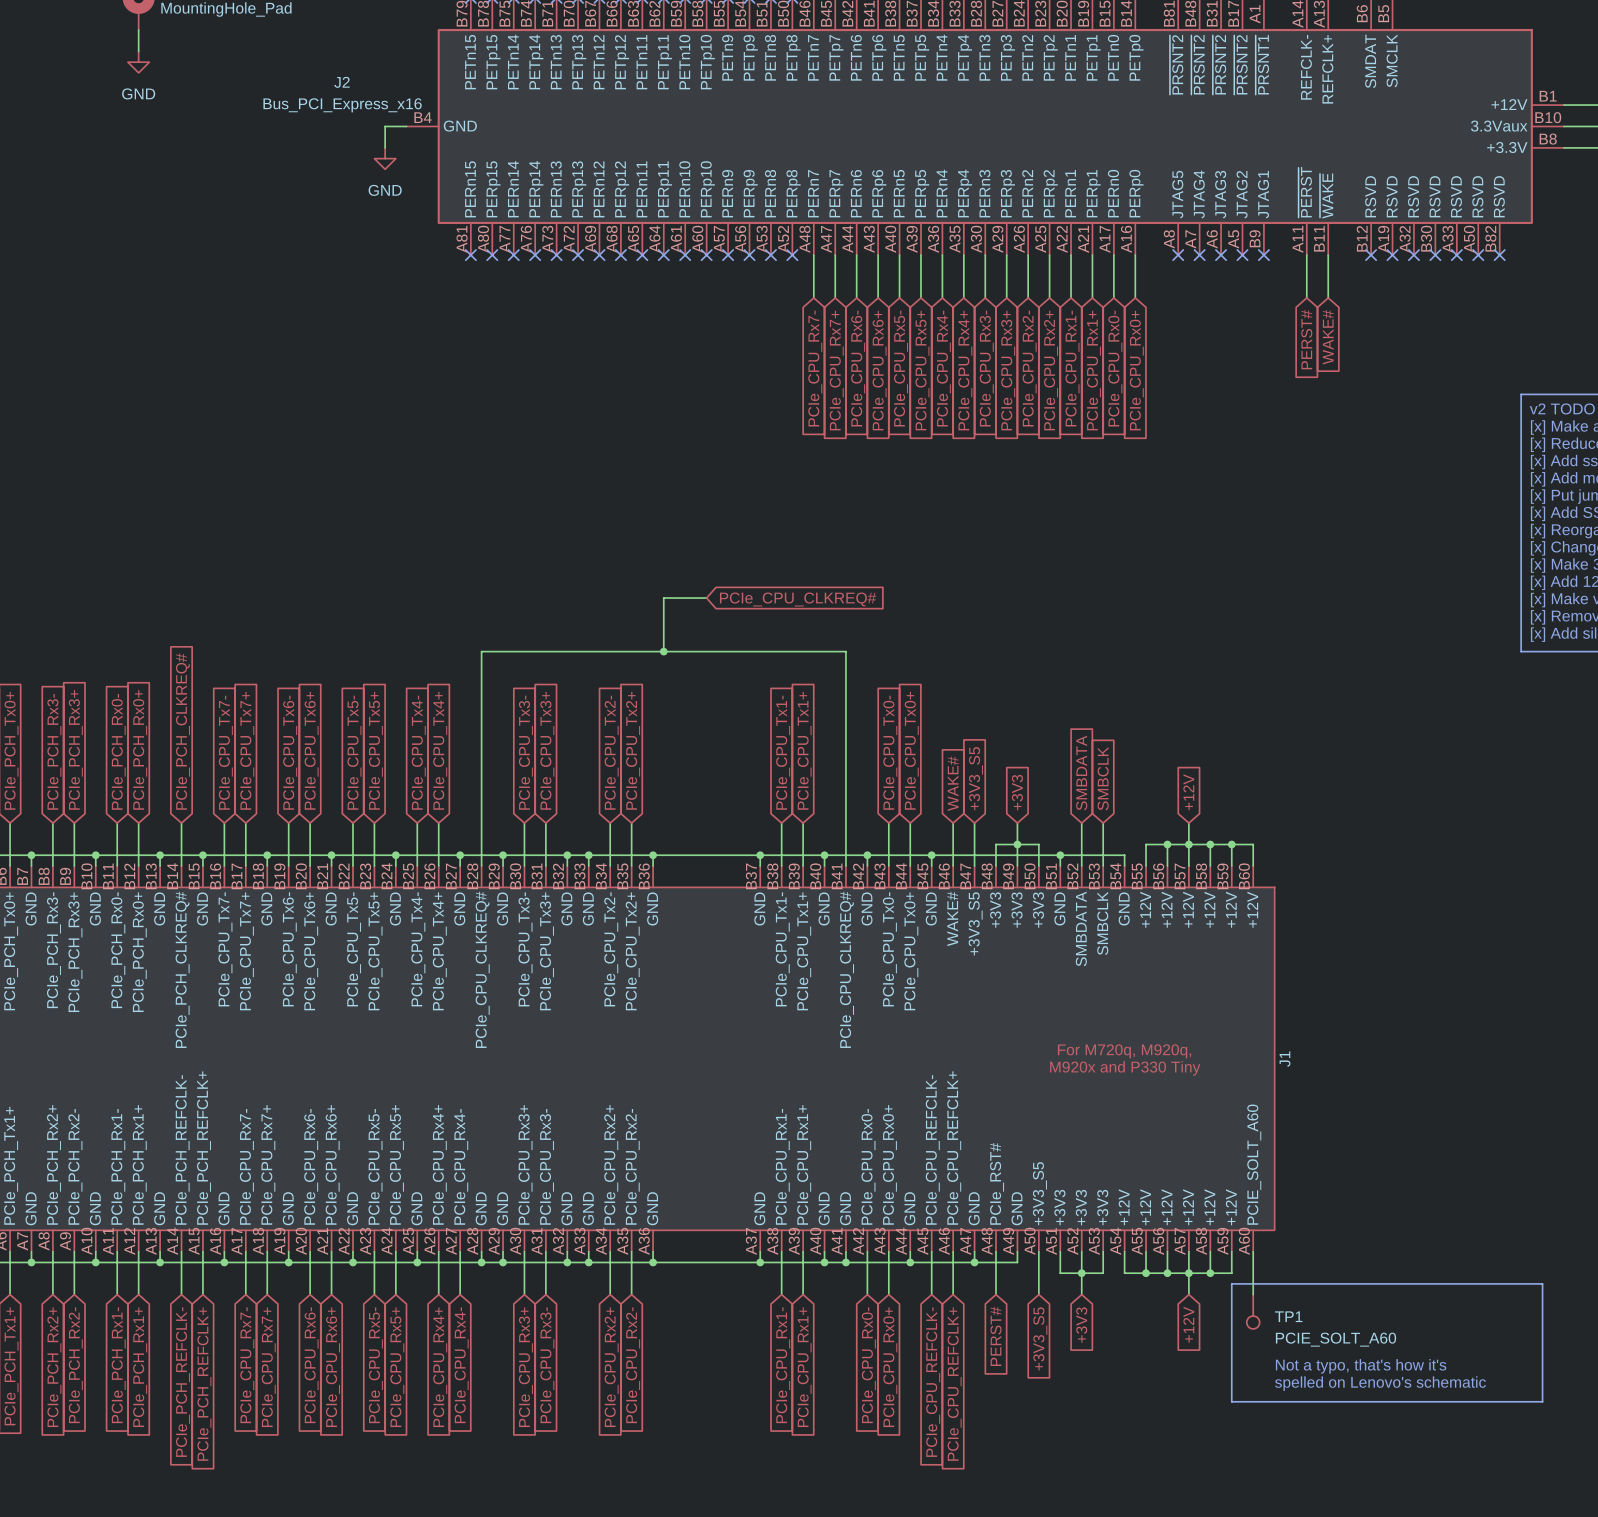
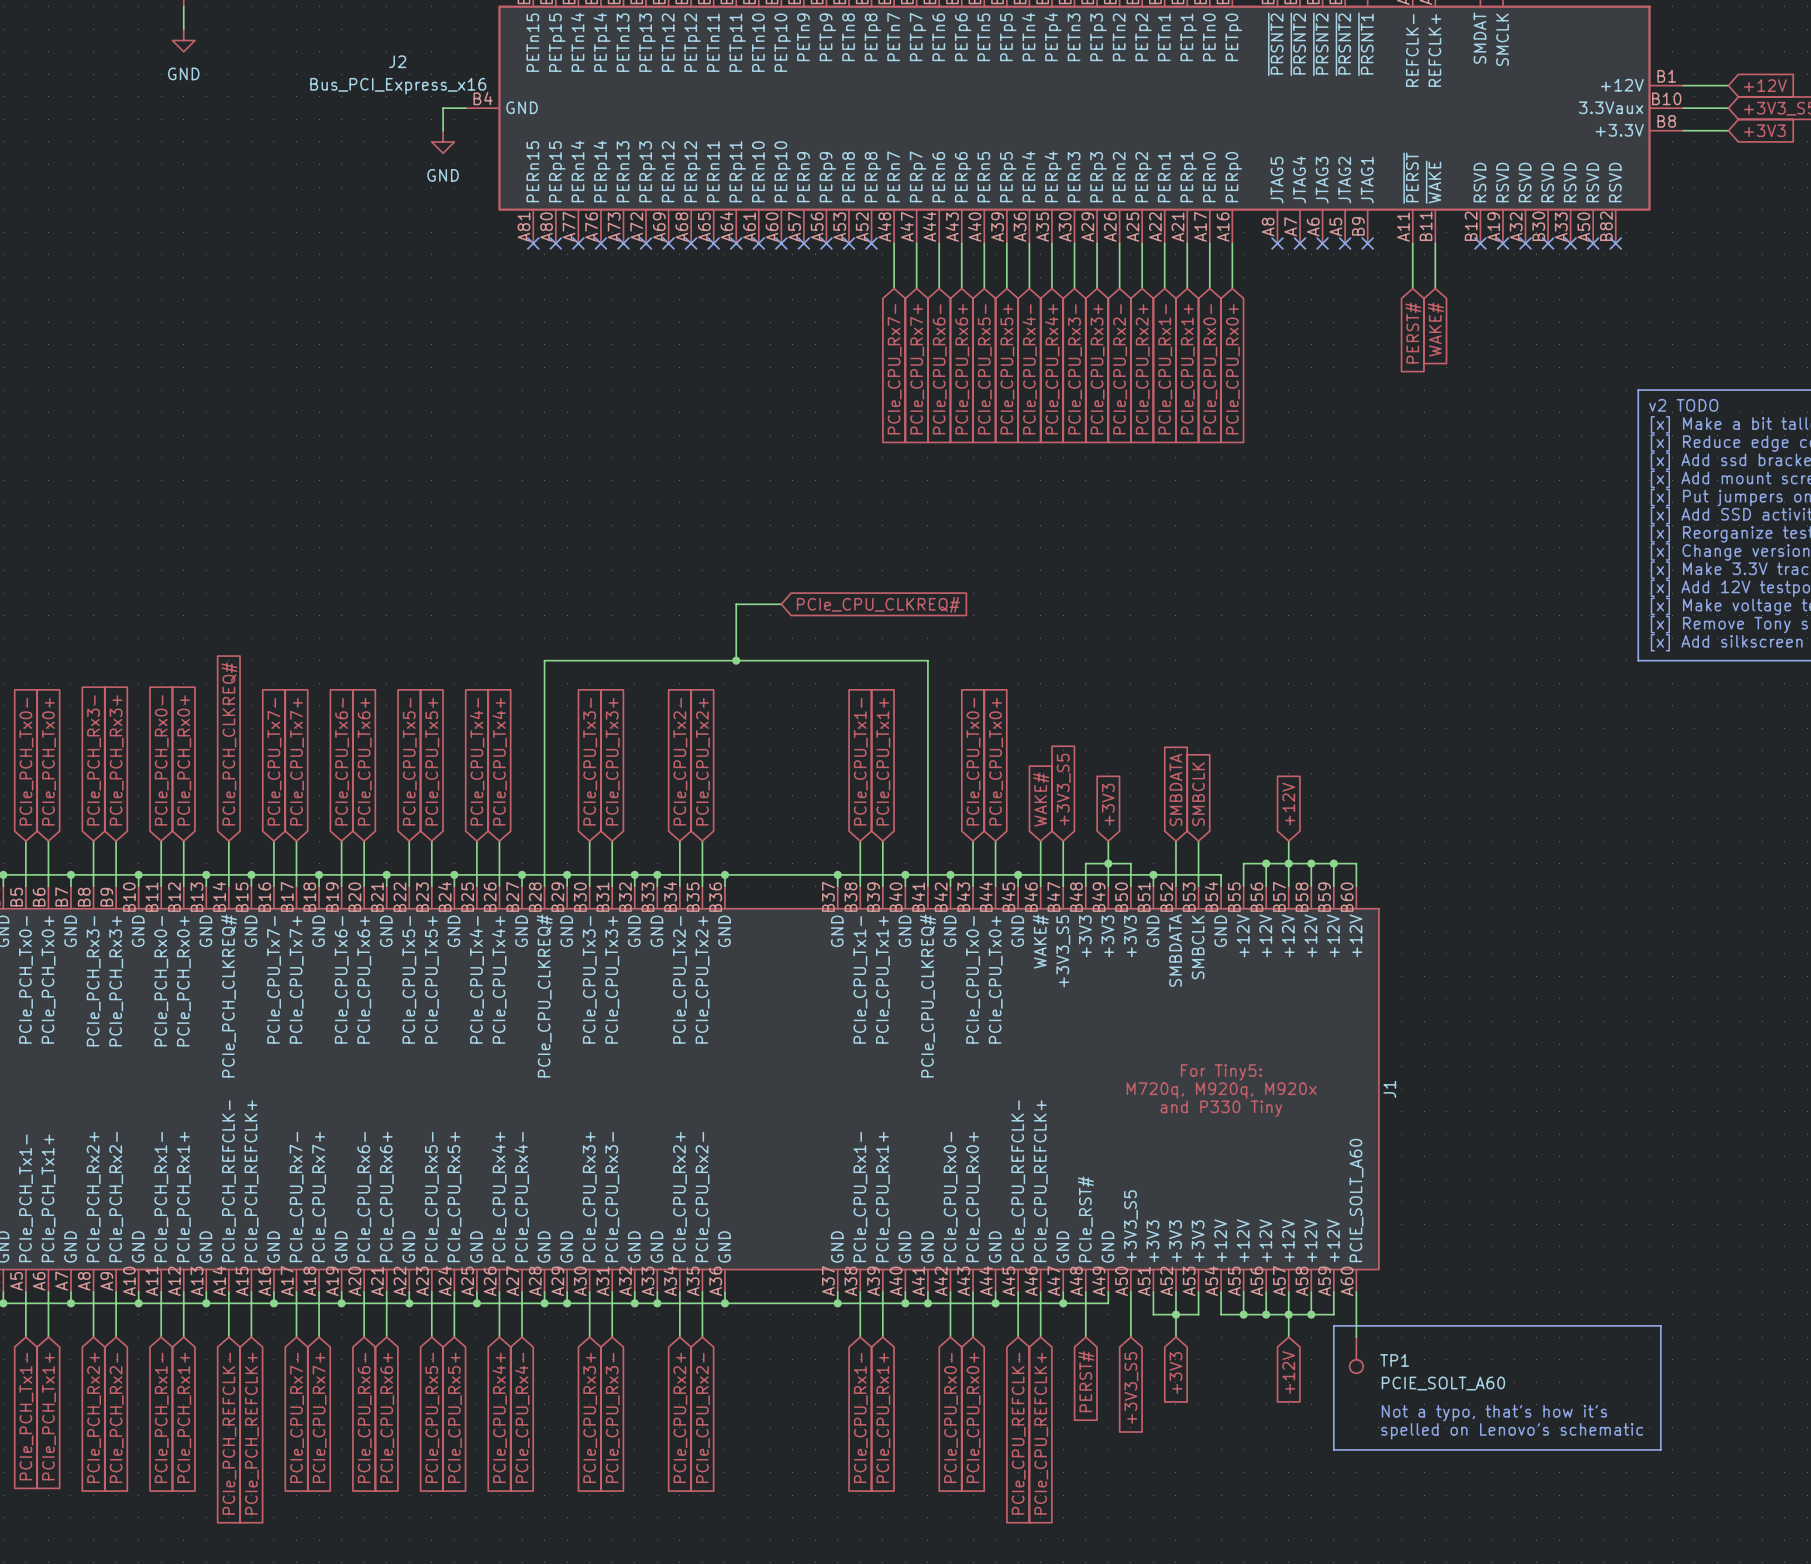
J1 text: none -> For Tiny5: (1221, 1072)
J1 text: For M720q, M920q, (1124, 1051) -> none
J1 text: none -> M720q, M920q, M920x (1221, 1090)
J1 text: M920x and P330 Tiny (1125, 1068) -> none
J1 text: none -> and P330 Tiny (1221, 1108)

